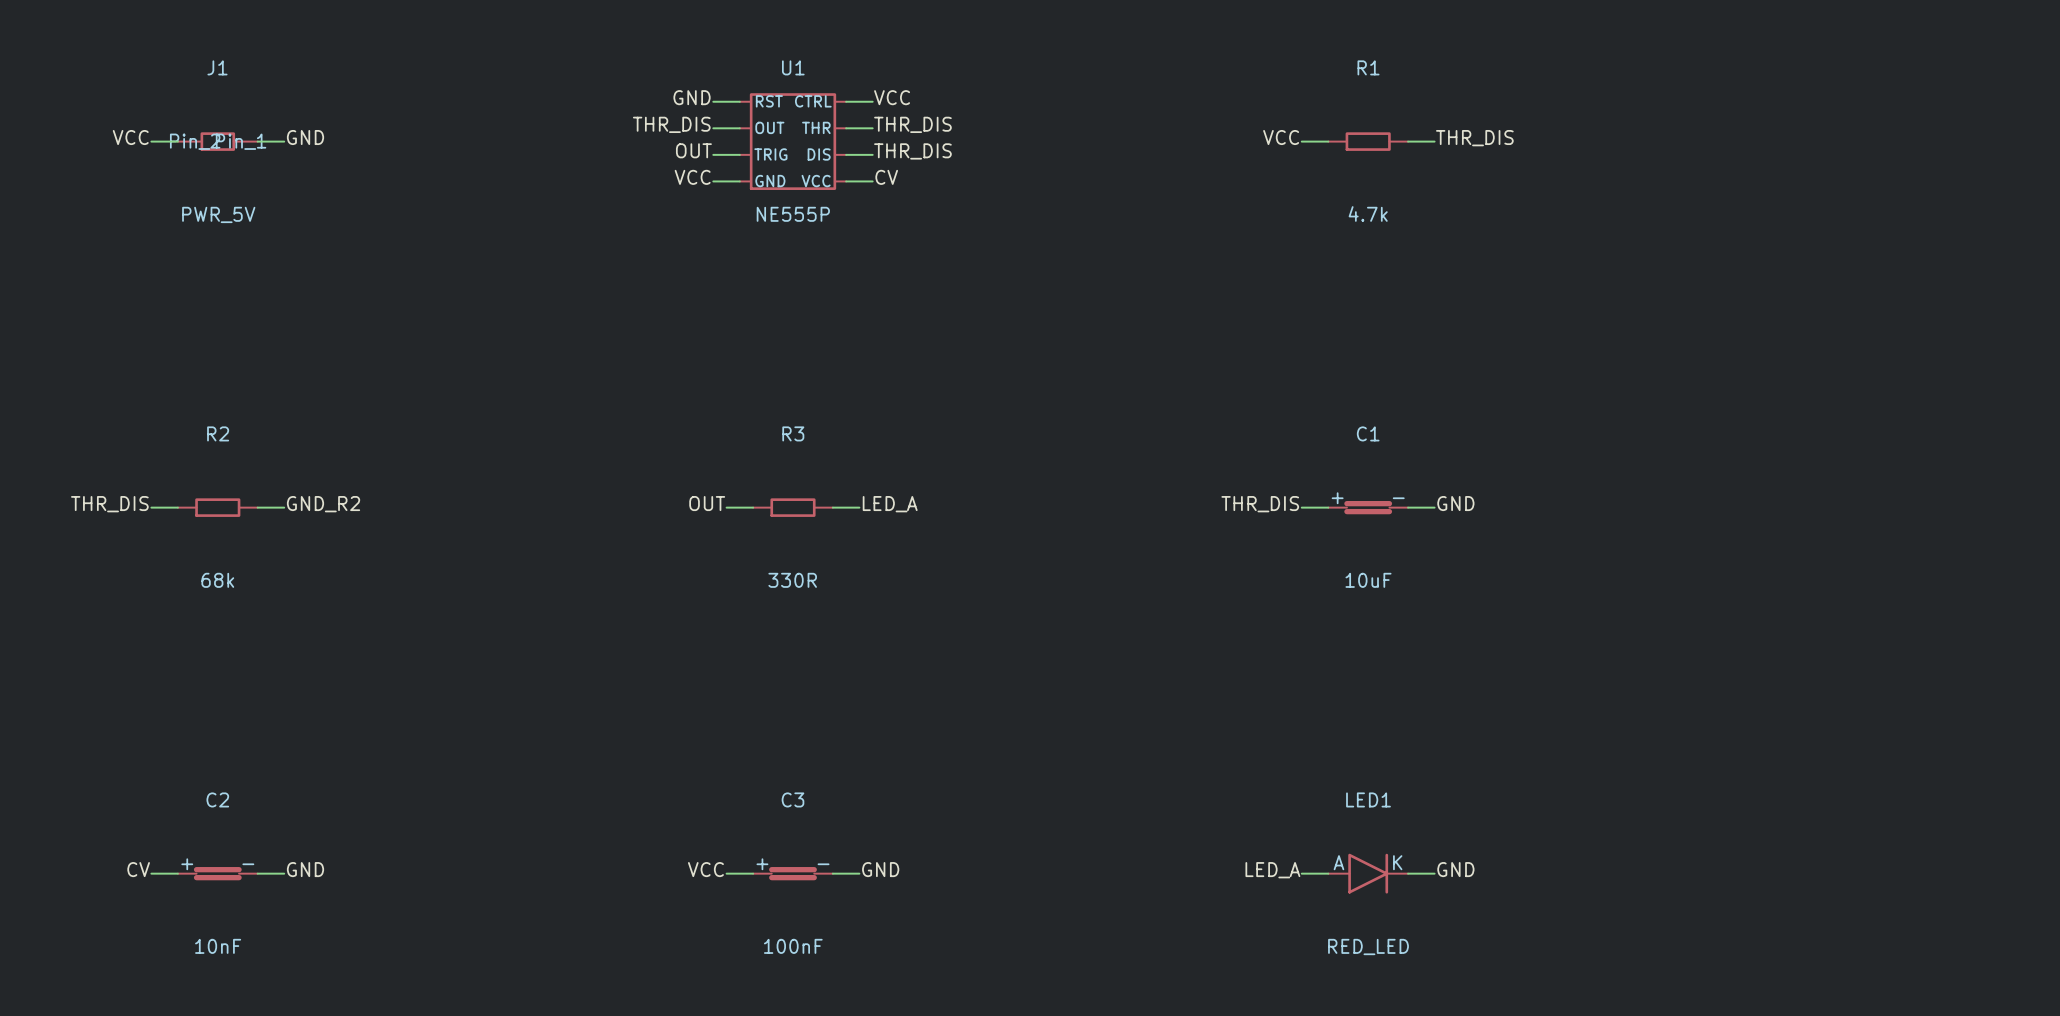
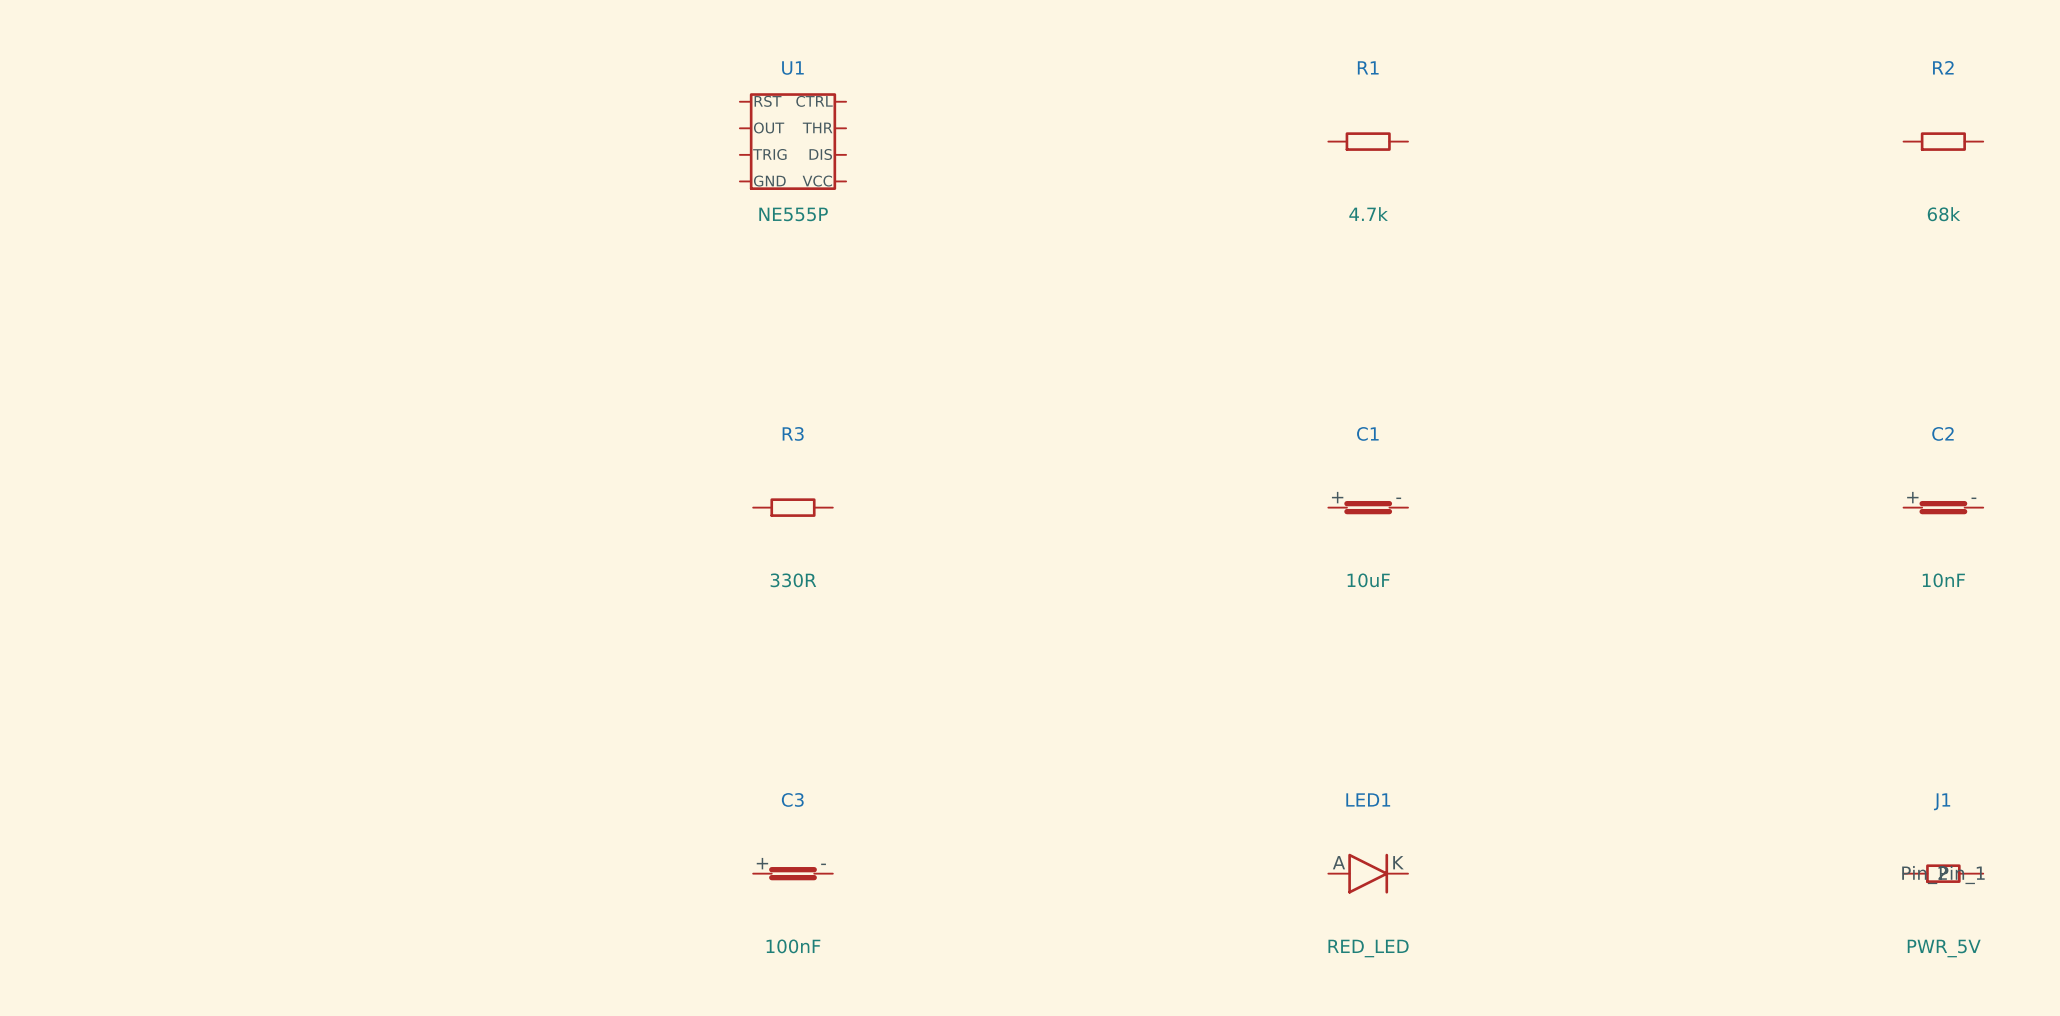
label: GND (692, 97) -> none
label: VCC (892, 97) -> none
wire: (713, 101) (739, 101) -> none
wire: (846, 101) (872, 101) -> none
label: THR_DIS (671, 124) -> none
label: THR_DIS (912, 124) -> none
wire: (713, 128) (739, 128) -> none
wire: (846, 128) (872, 128) -> none
label: VCC (130, 137) -> none
label: GND (305, 137) -> none
label: VCC (1281, 137) -> none
label: THR_DIS (1474, 138) -> none
wire: (151, 141) (177, 141) -> none
J1 position: (217, 141) -> (1943, 873)
wire: (257, 141) (284, 141) -> none
wire: (1301, 141) (1328, 141) -> none
wire: (1408, 141) (1434, 141) -> none
label: OUT (693, 150) -> none
label: THR_DIS (912, 151) -> none
wire: (713, 154) (739, 154) -> none
wire: (846, 154) (872, 154) -> none
label: VCC (692, 177) -> none
label: CV (886, 177) -> none
wire: (713, 181) (739, 181) -> none
wire: (846, 181) (872, 181) -> none
label: OUT (707, 503) -> none
label: GND (1455, 503) -> none
label: THR_DIS (109, 504) -> none
label: GND_R2 (323, 504) -> none
label: LED_A (890, 504) -> none
label: THR_DIS (1260, 504) -> none
wire: (151, 507) (177, 507) -> none
R2 position: (217, 507) -> (1943, 141)
wire: (257, 507) (284, 507) -> none
wire: (726, 507) (753, 507) -> none
wire: (832, 507) (859, 507) -> none
wire: (1301, 507) (1328, 507) -> none
wire: (1408, 507) (1434, 507) -> none
label: CV (138, 869) -> none
label: GND (305, 869) -> none
label: VCC (705, 869) -> none
label: GND (880, 869) -> none
label: GND (1455, 869) -> none
label: LED_A (1272, 870) -> none
wire: (151, 873) (177, 873) -> none
C2 position: (217, 873) -> (1943, 507)
wire: (257, 873) (284, 873) -> none
wire: (726, 873) (753, 873) -> none
wire: (832, 873) (859, 873) -> none
wire: (1301, 873) (1328, 873) -> none
wire: (1408, 873) (1434, 873) -> none

